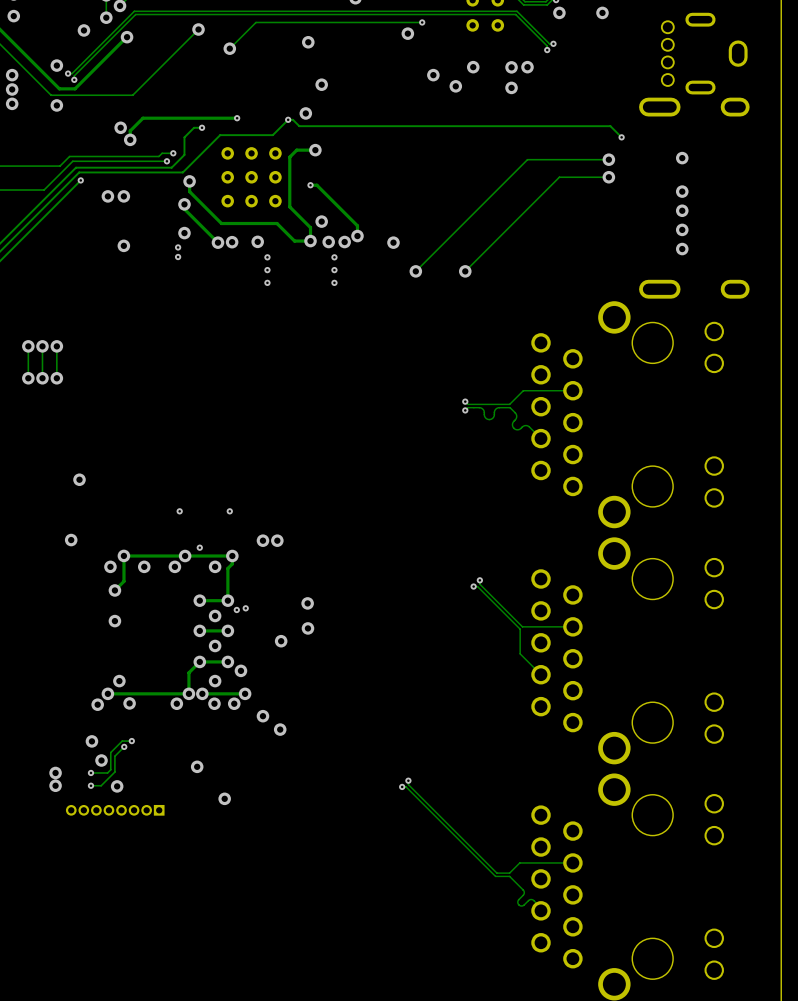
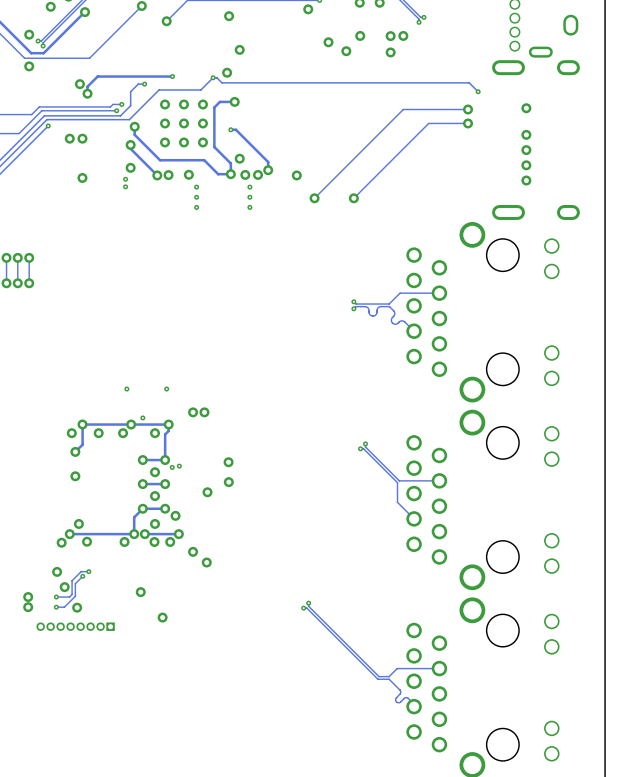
via: (79, 479) -> none
via: (71, 540) -> none

